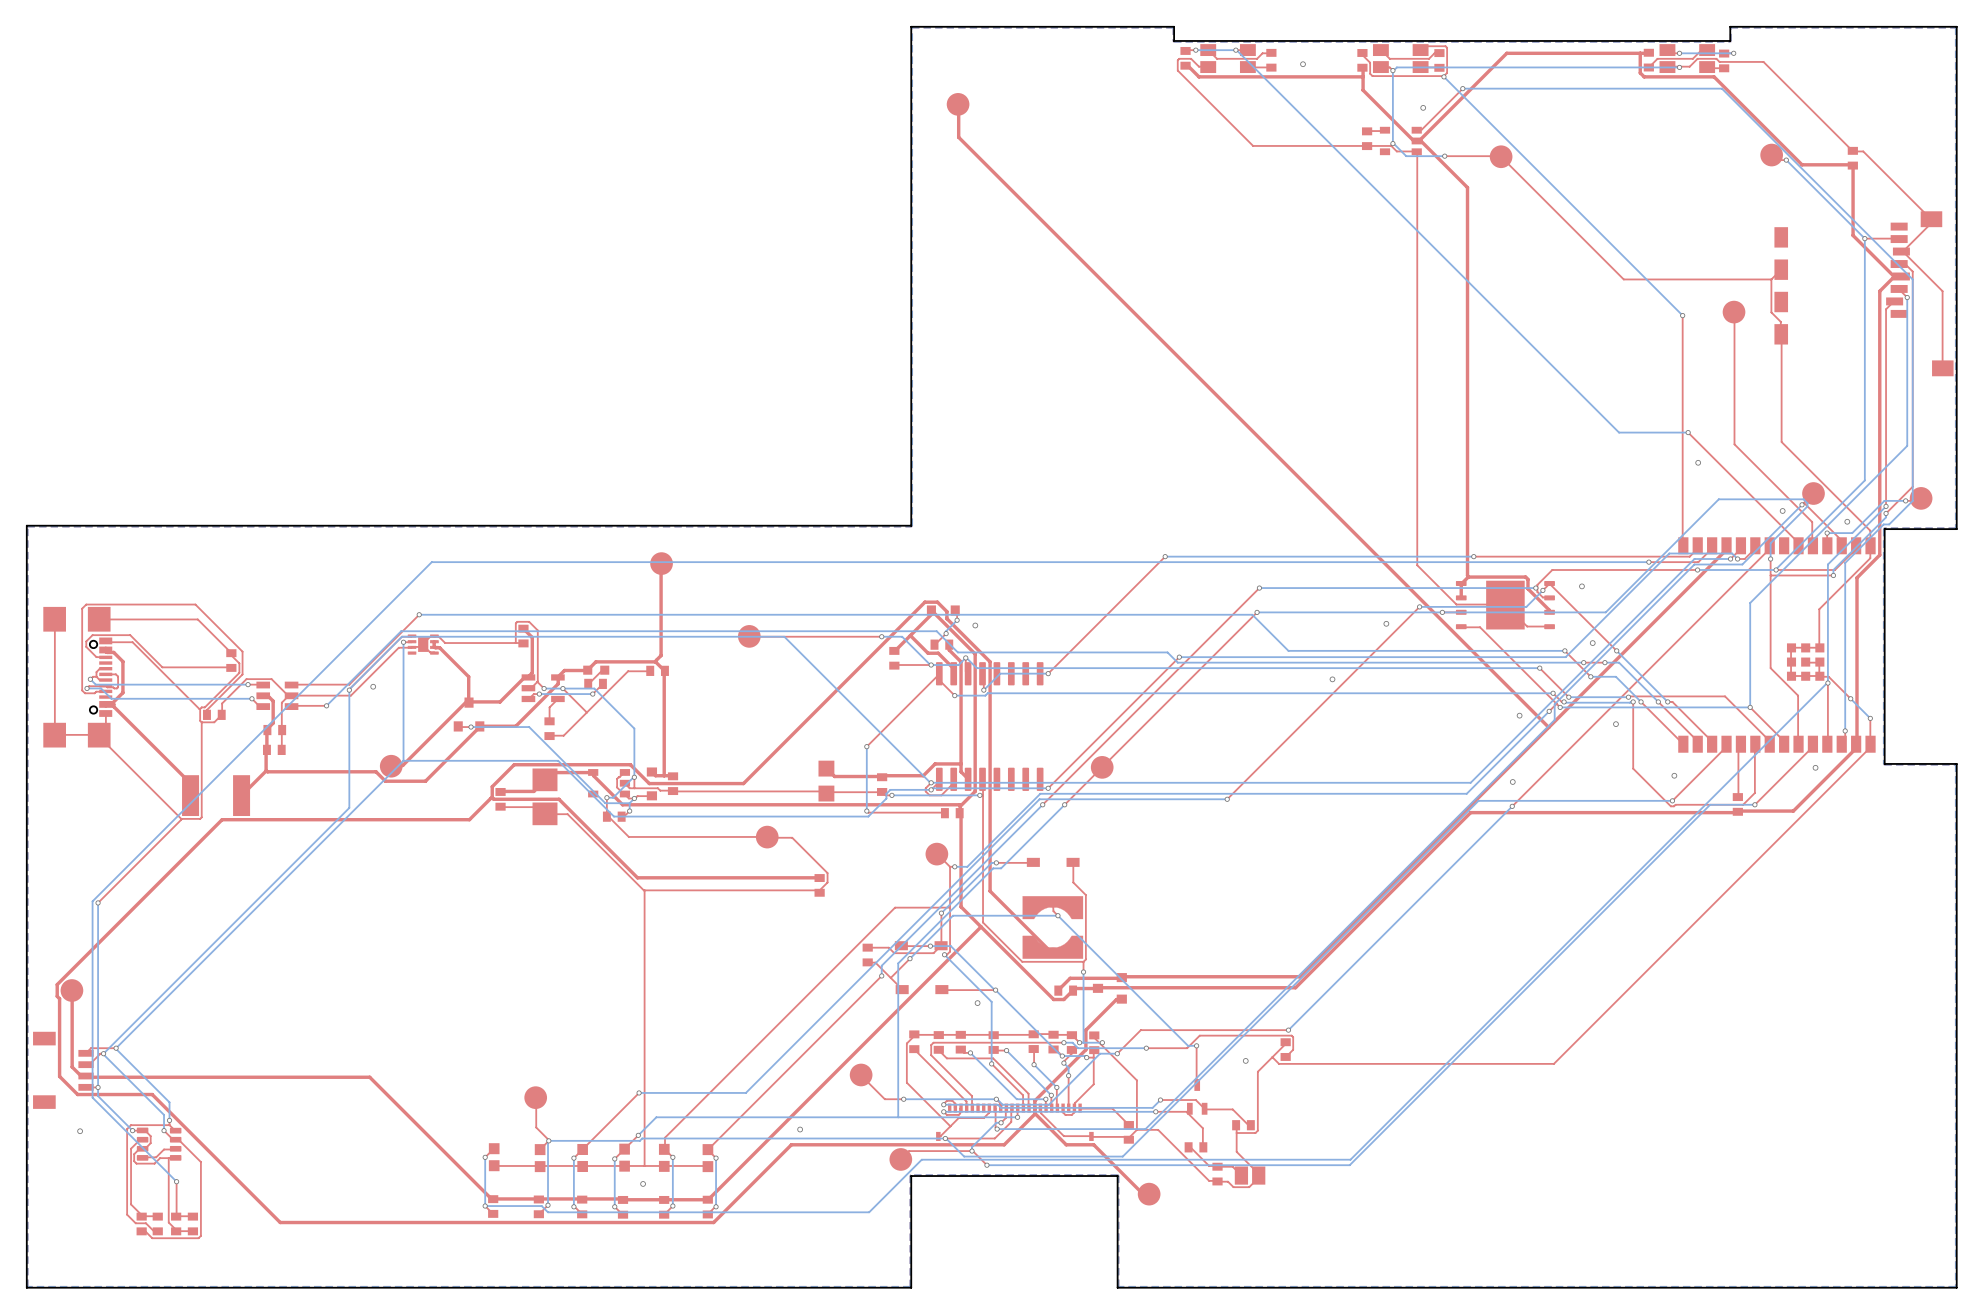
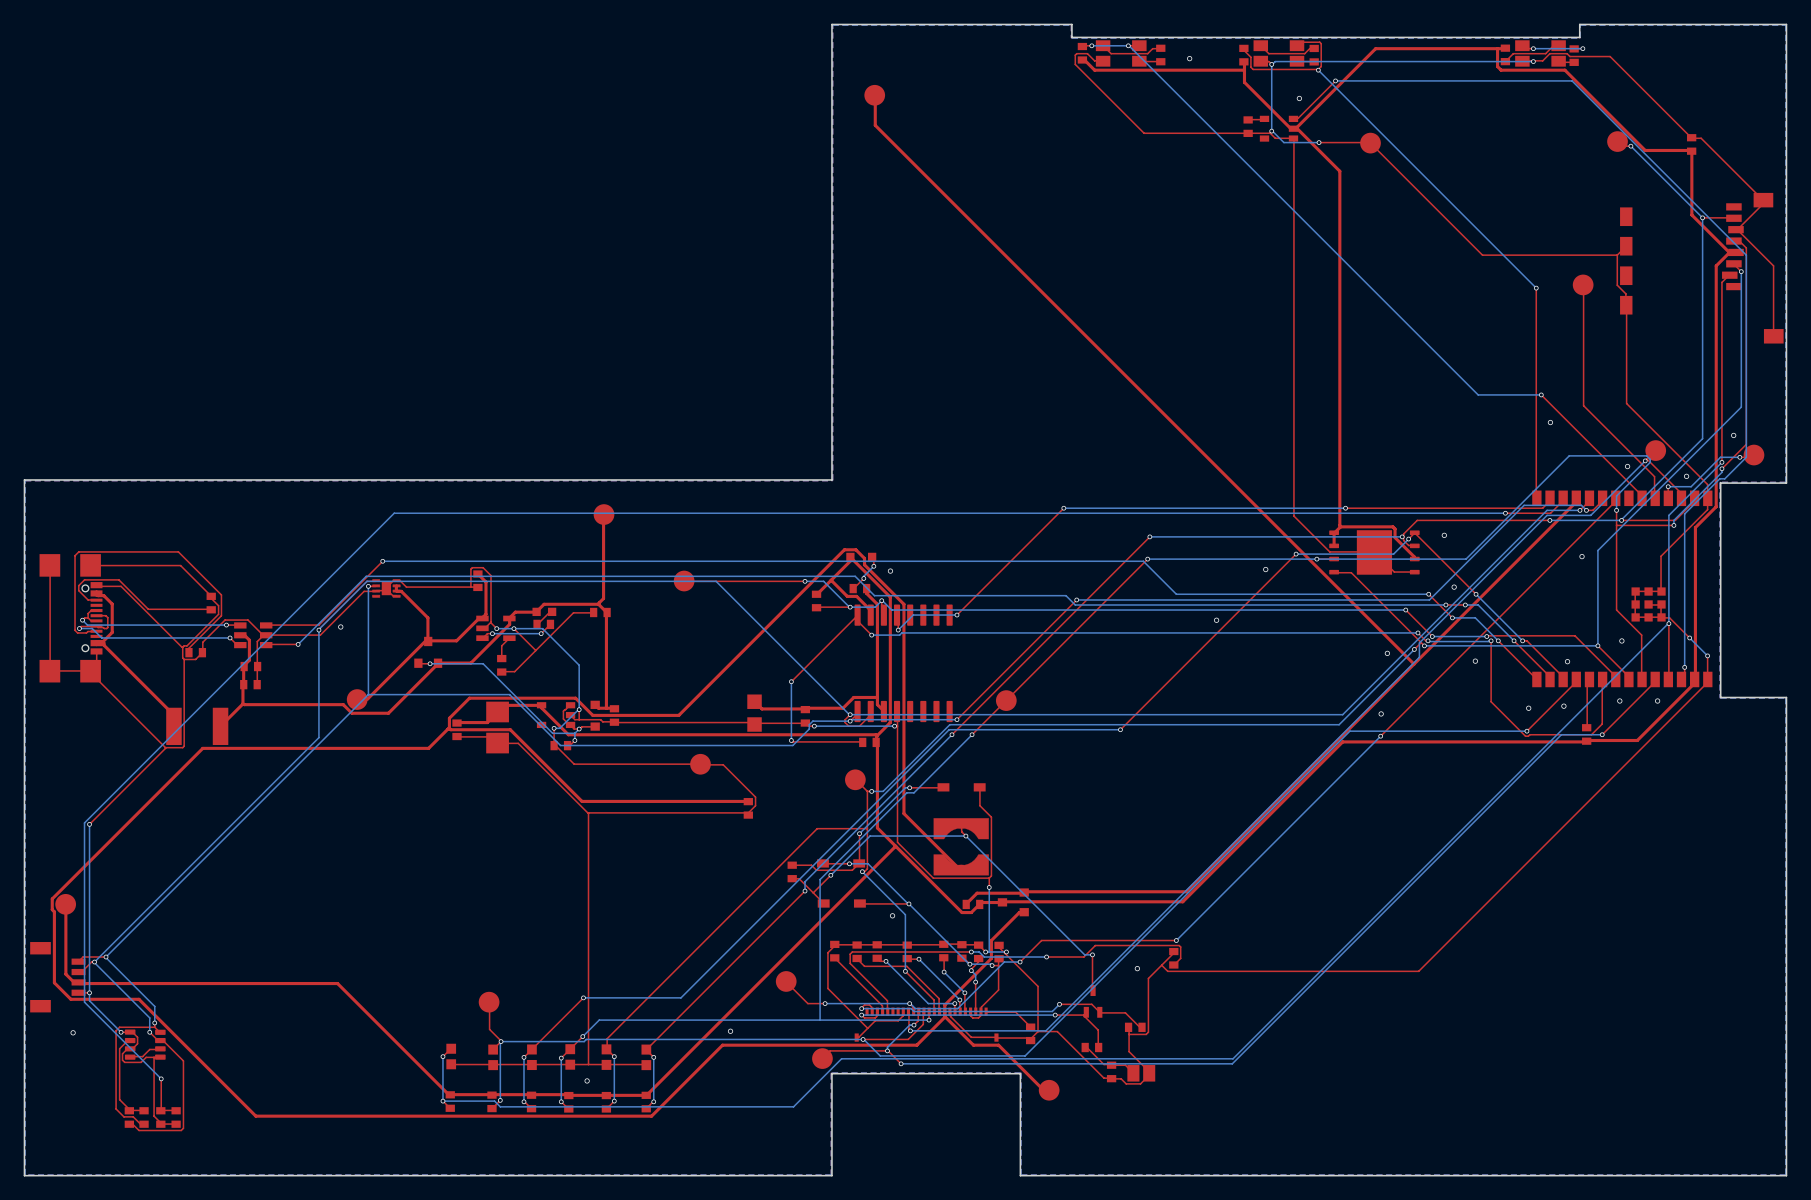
via: none -> (1733, 435)
via: none -> (1582, 556)
via: none -> (1621, 640)
via: none -> (1567, 661)
via: none -> (1619, 701)
via: none -> (1563, 706)

